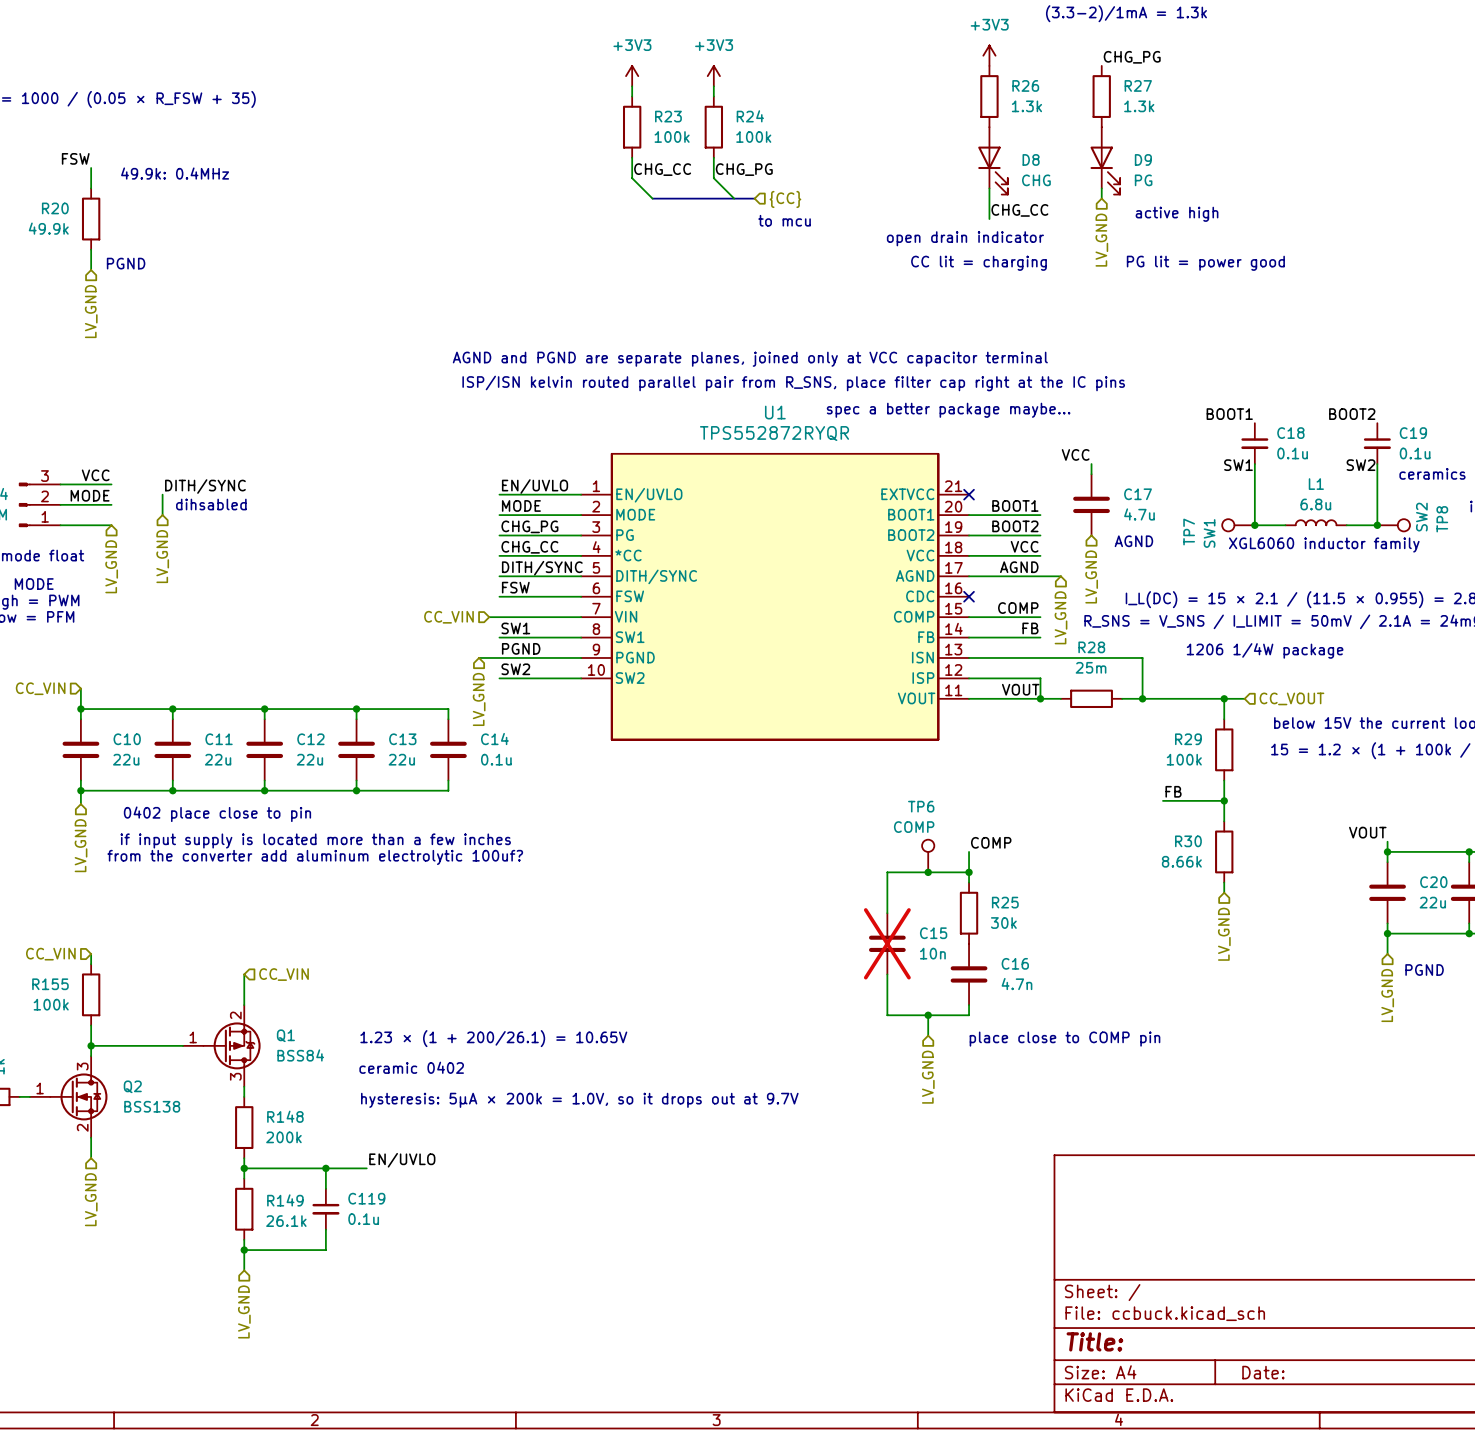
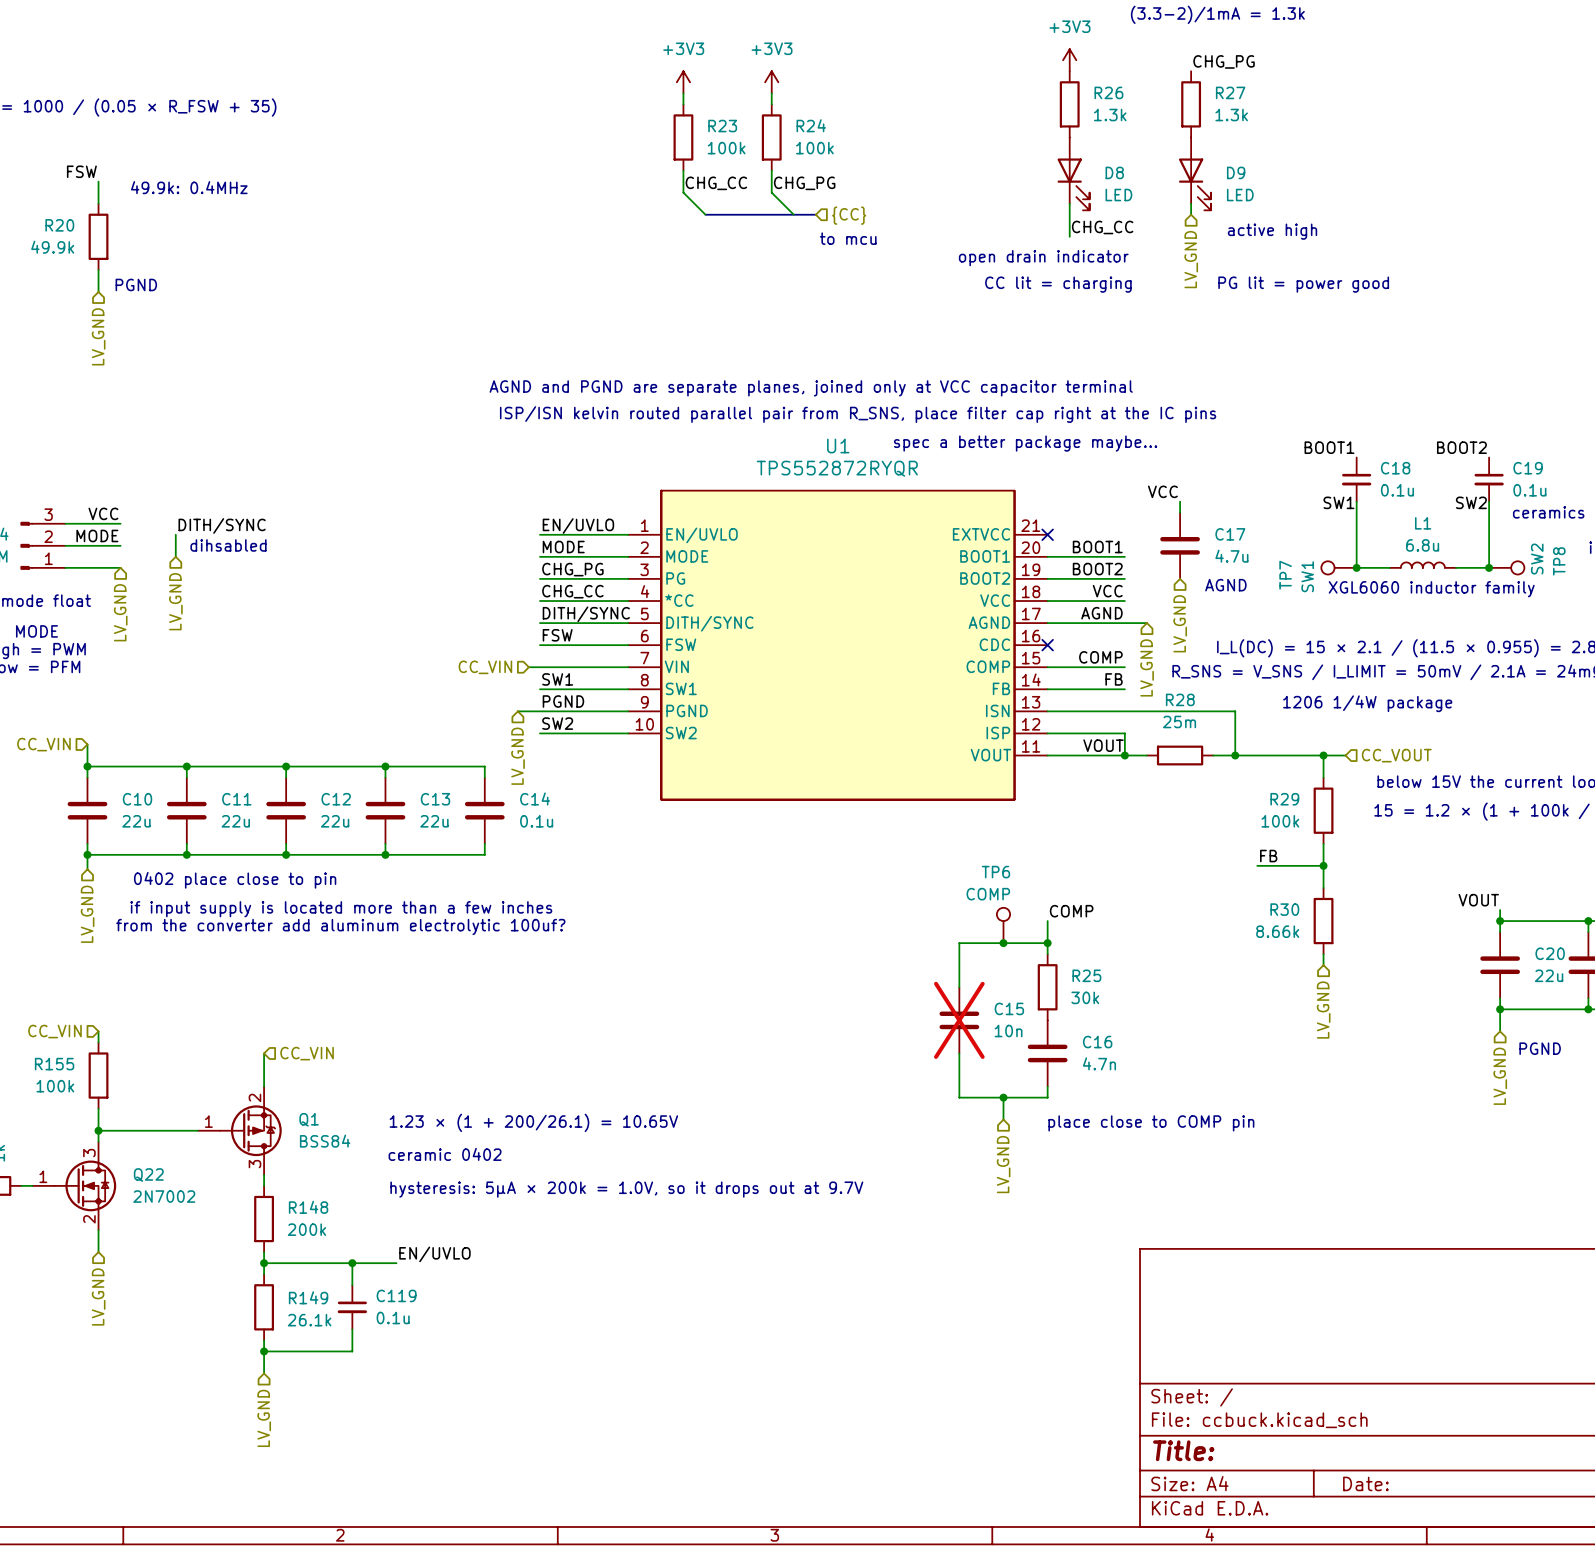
D8 value: CHG (1036, 180) -> LED (1118, 195)
D9 value: PG (1143, 180) -> LED (1240, 195)
Q2 name: Q2 (132, 1086) -> Q22 (148, 1175)
Q2 value: BSS138 (152, 1106) -> 2N7002 (164, 1196)

